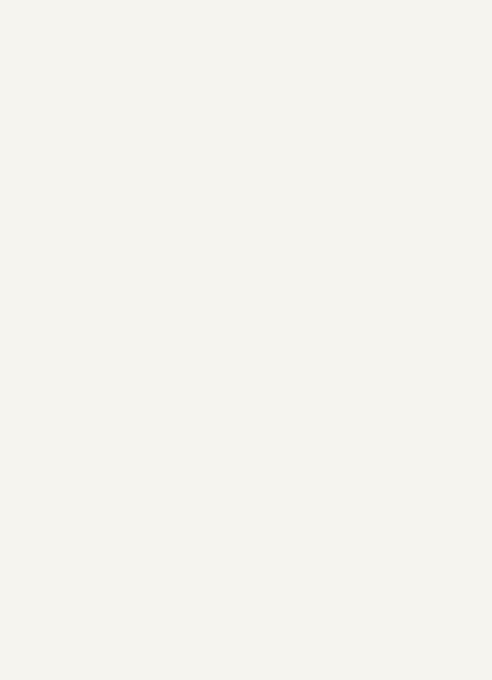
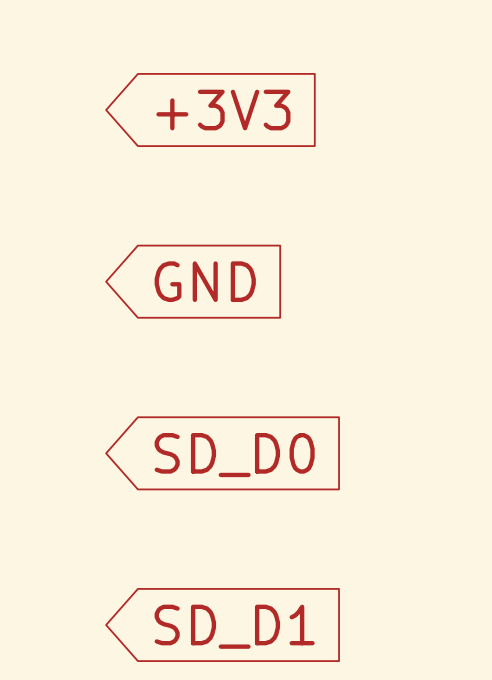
global label: none -> +3V3 (223, 110)
global label: none -> GND (205, 281)
global label: none -> SD_D0 (234, 455)
global label: none -> SD_D1 (234, 626)

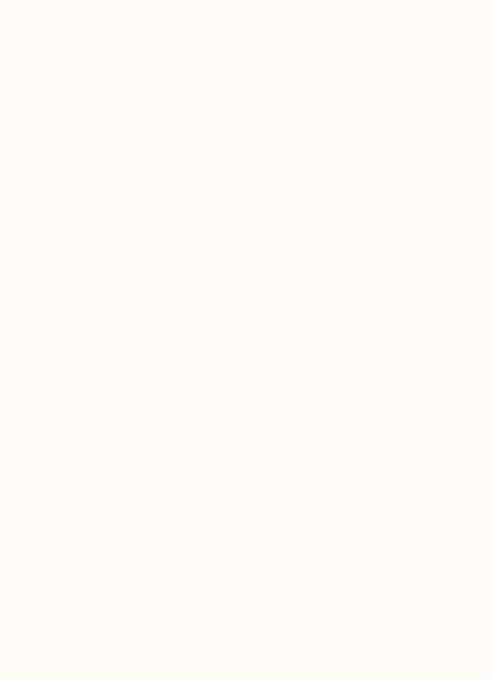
global label: +3V3 (223, 110) -> none
global label: GND (205, 281) -> none
global label: SD_D0 (234, 455) -> none
global label: SD_D1 (234, 626) -> none

